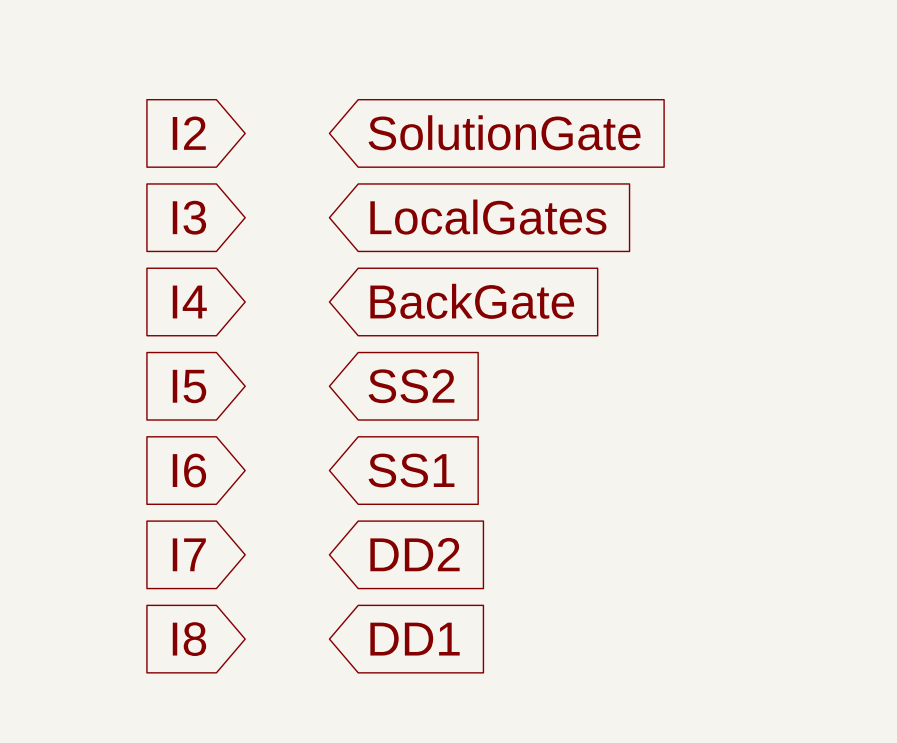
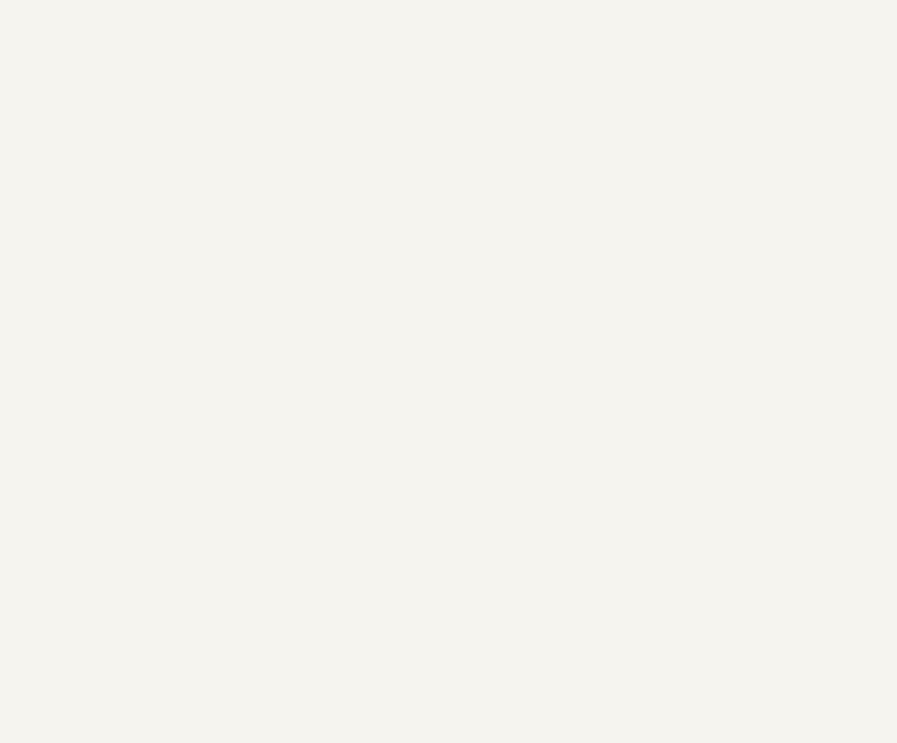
global label: SolutionGate (504, 132) -> none
global label: I2 (189, 133) -> none
global label: I3 (189, 217) -> none
global label: LocalGates (488, 217) -> none
global label: I4 (189, 301) -> none
global label: BackGate (472, 301) -> none
global label: I5 (189, 386) -> none
global label: SS2 (411, 386) -> none
global label: I6 (189, 470) -> none
global label: SS1 (411, 470) -> none
global label: I7 (189, 554) -> none
global label: DD2 (414, 554) -> none
global label: I8 (189, 639) -> none
global label: DD1 (415, 639) -> none

